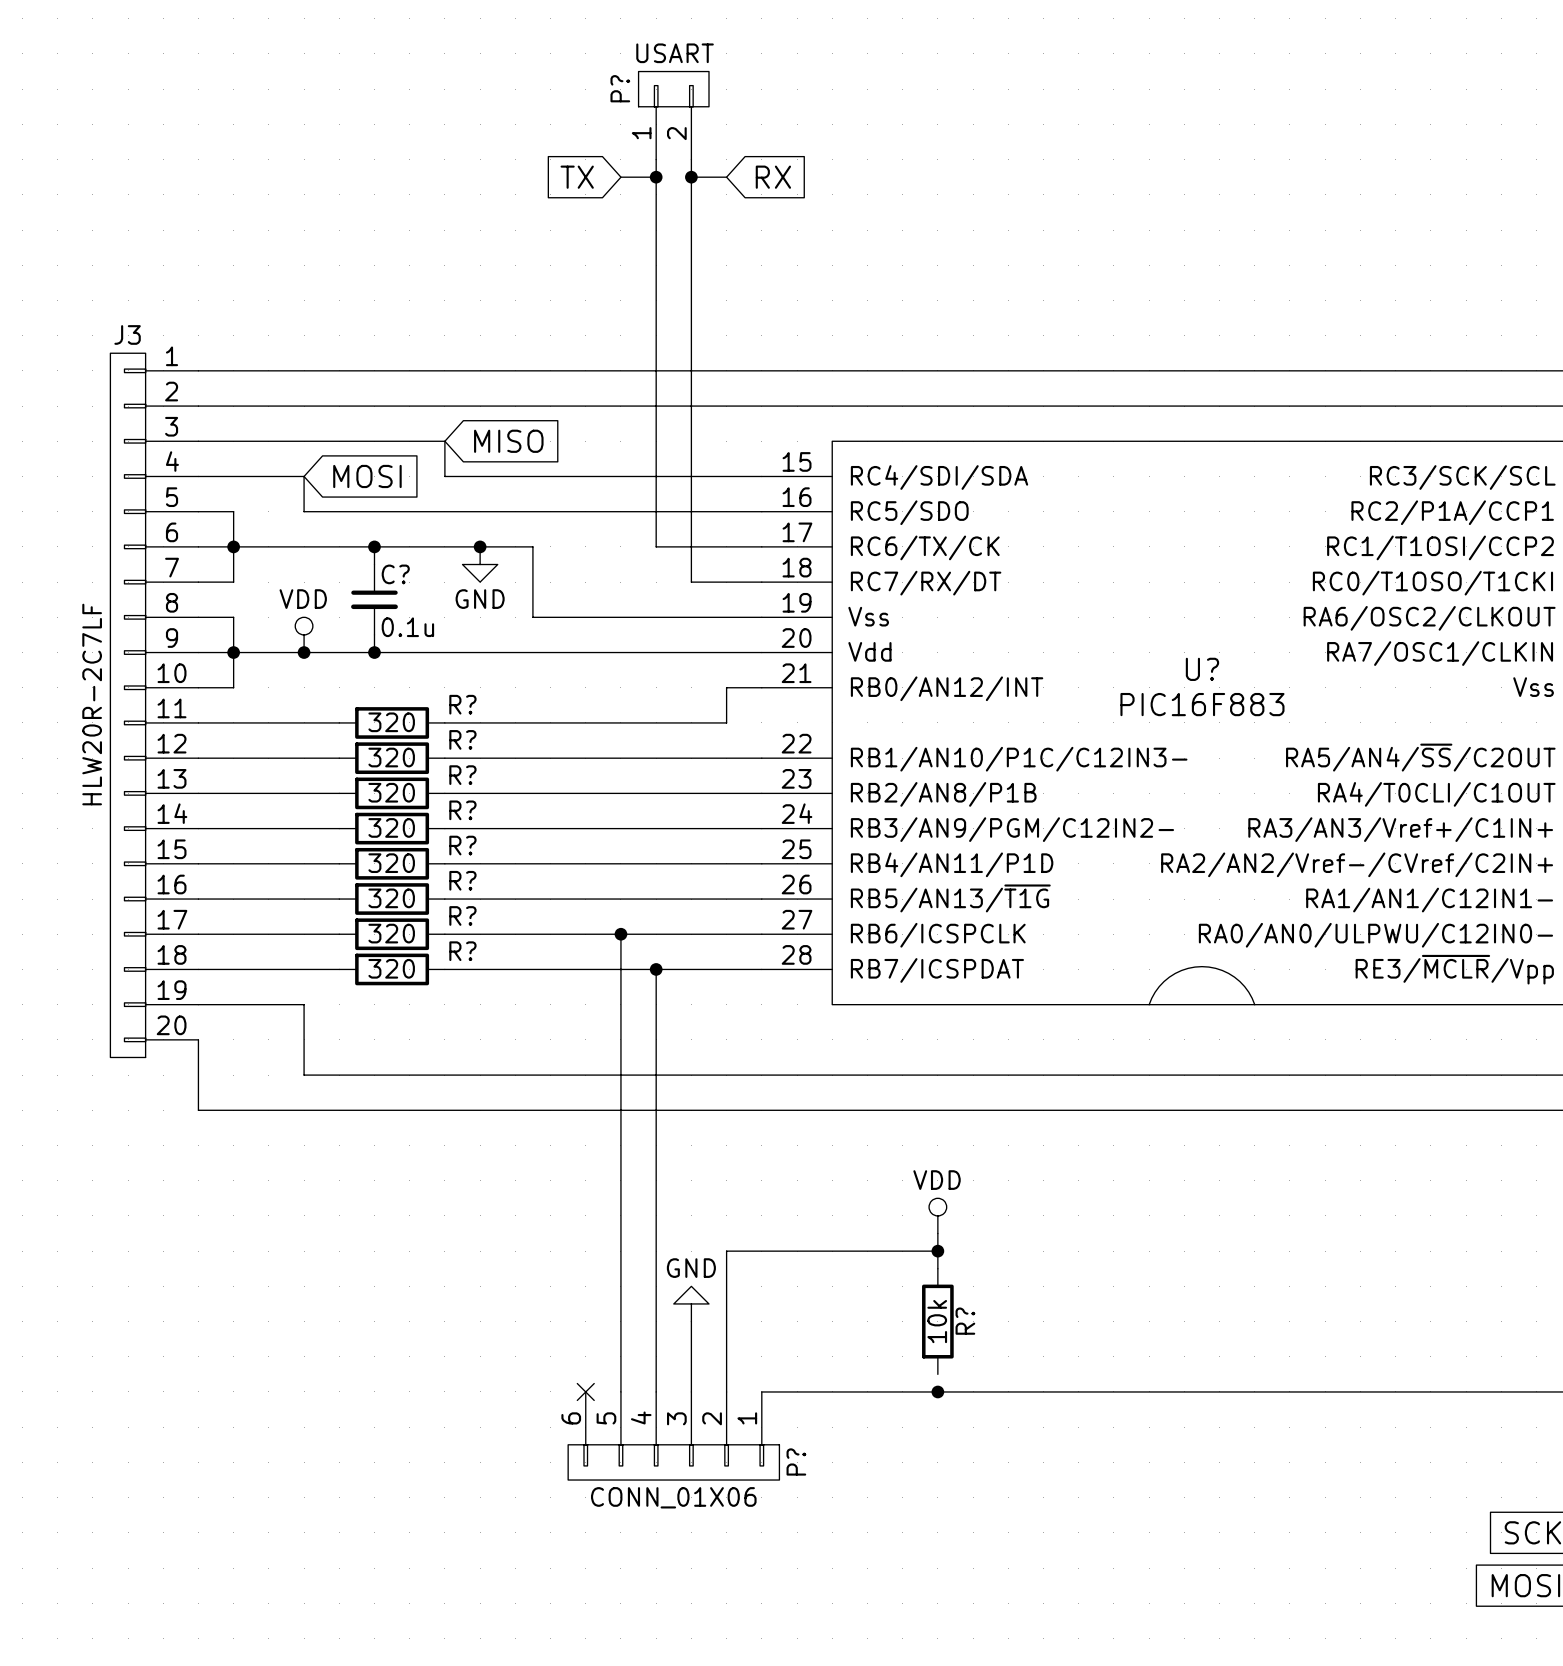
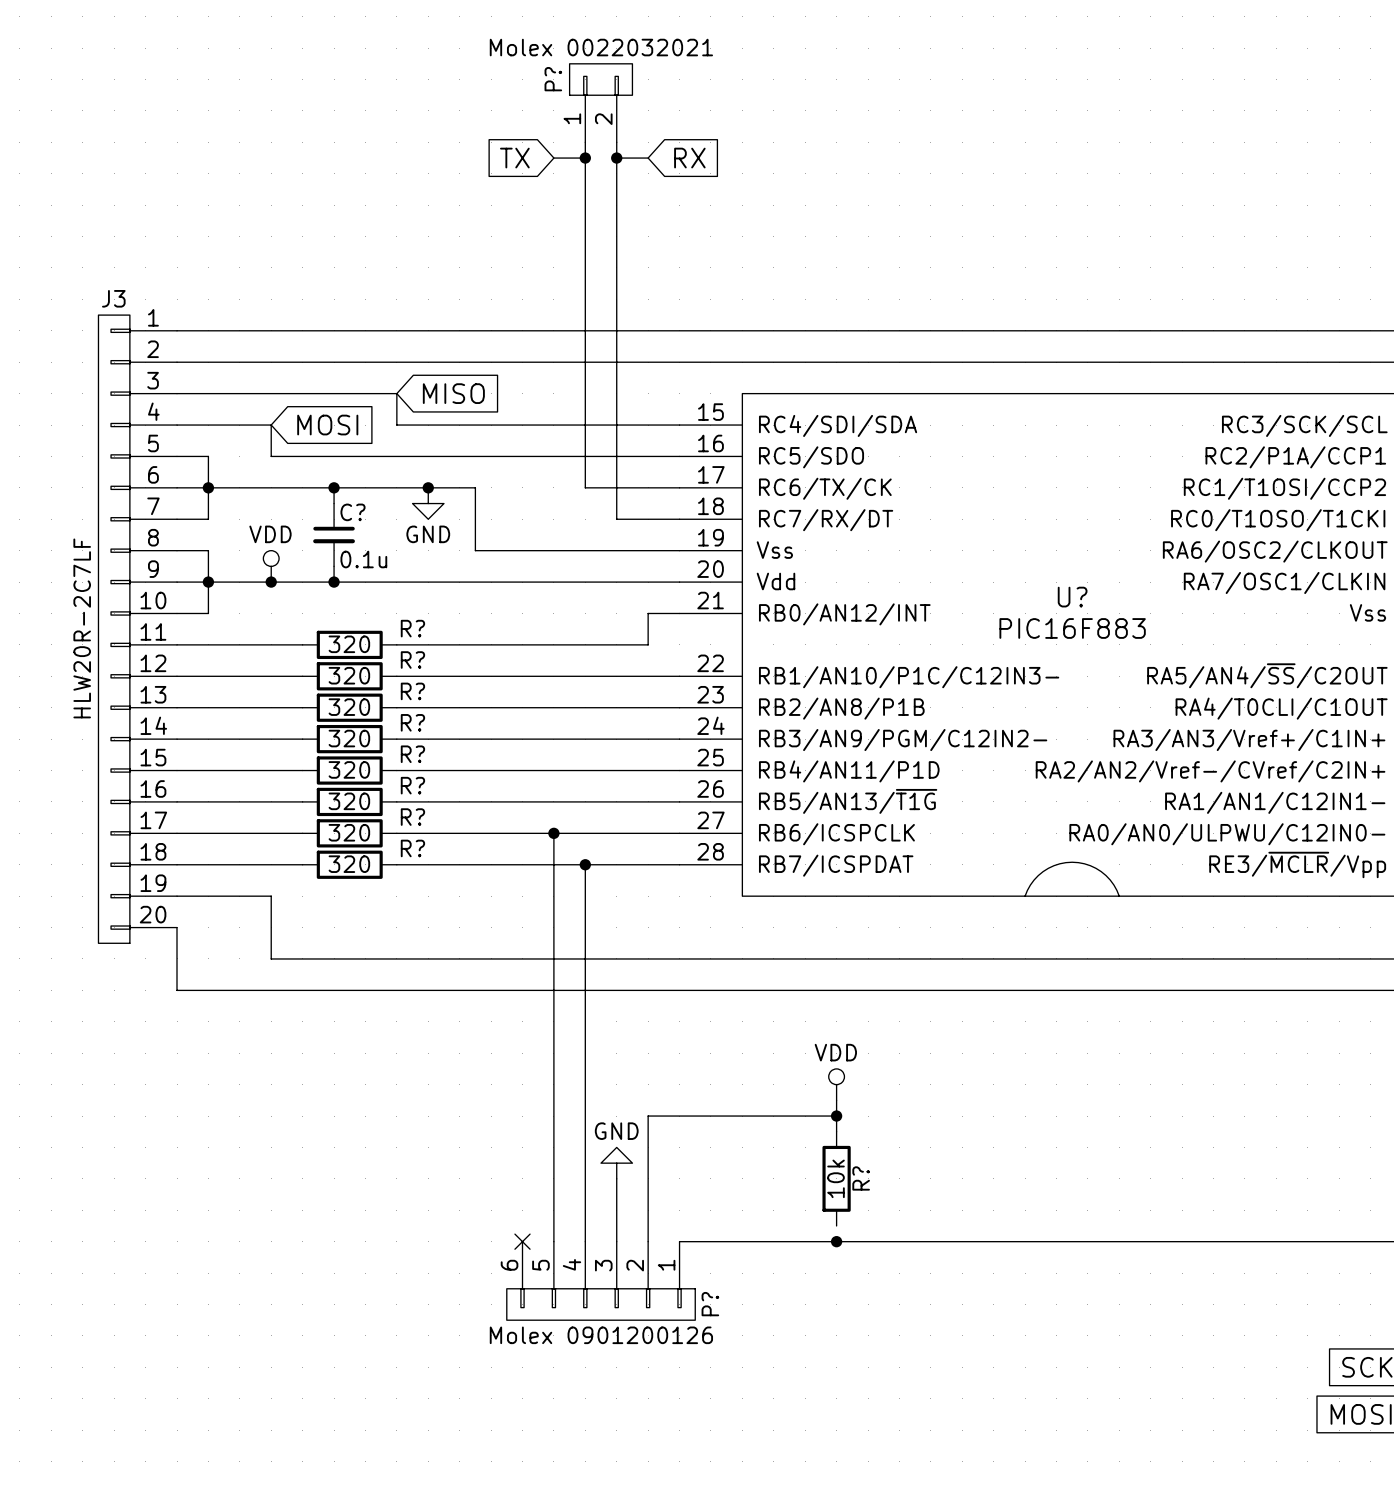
P? value: USART (675, 53) -> Molex 0022032021 (601, 47)
P? value: CONN_01X06 (673, 1497) -> Molex 0901200126 (601, 1335)

